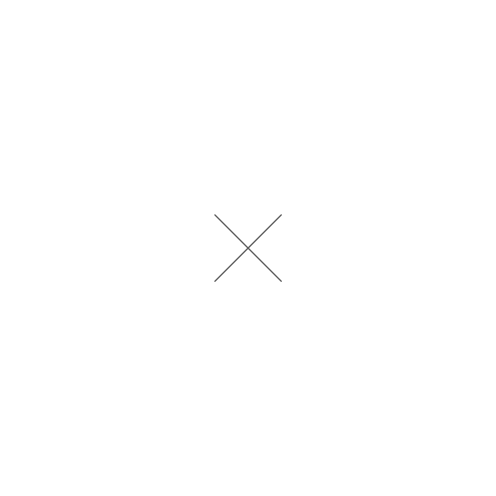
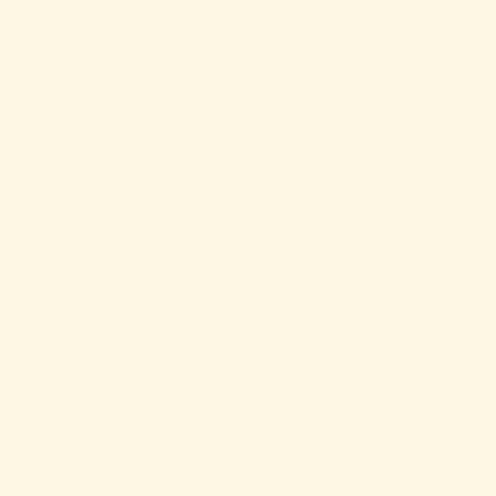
no-connect mark: (248, 248) -> none

